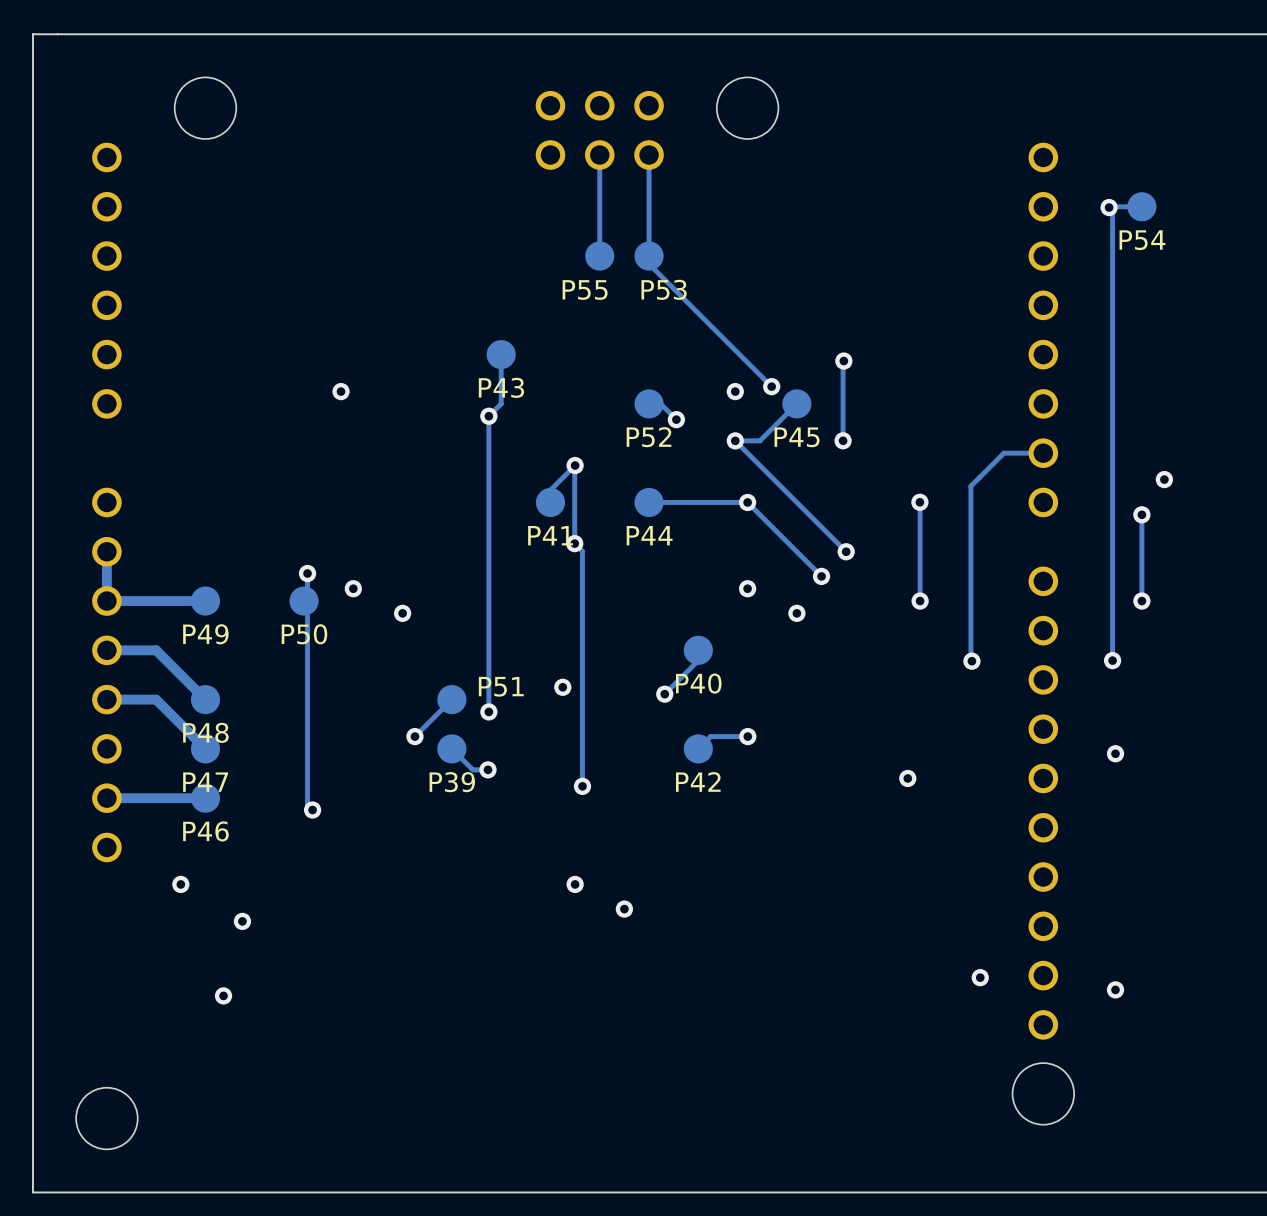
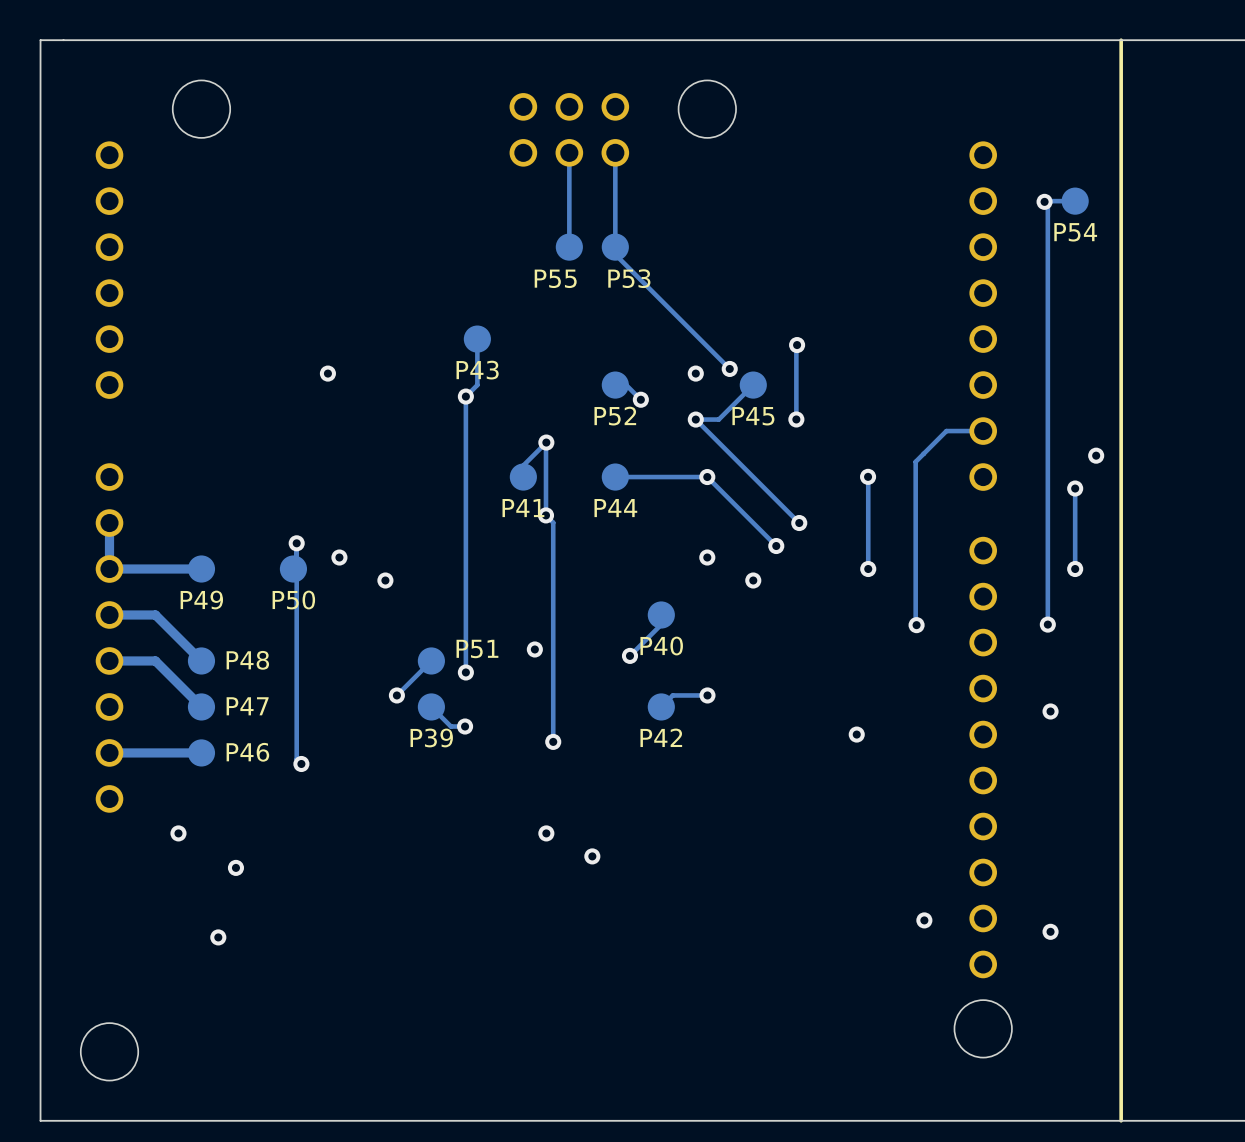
line: none -> (1121, 40) (1121, 1120)
P48 name position: P48 (205, 732) -> P48 (247, 660)
P47 name position: P47 (205, 782) -> P47 (247, 706)
P46 name position: P46 (205, 831) -> P46 (247, 752)

